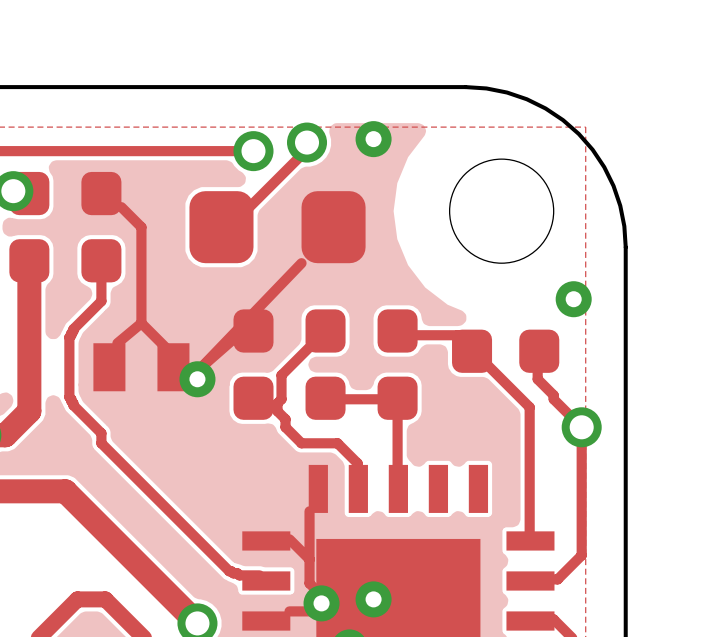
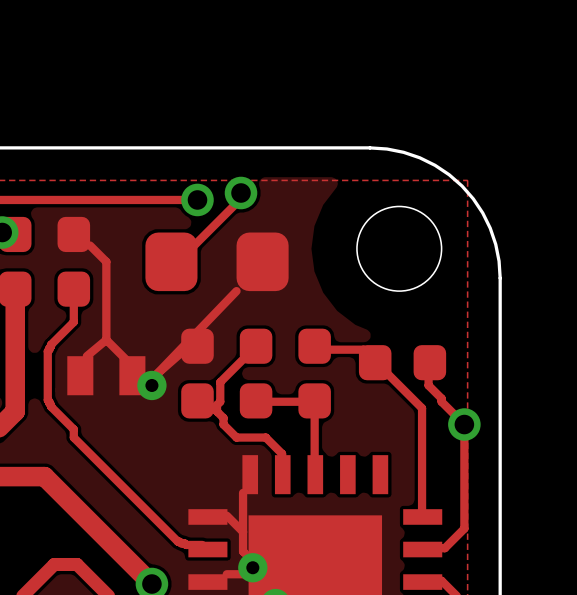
via: (373, 139) -> none
via: (573, 299) -> none
via: (373, 599) -> none

